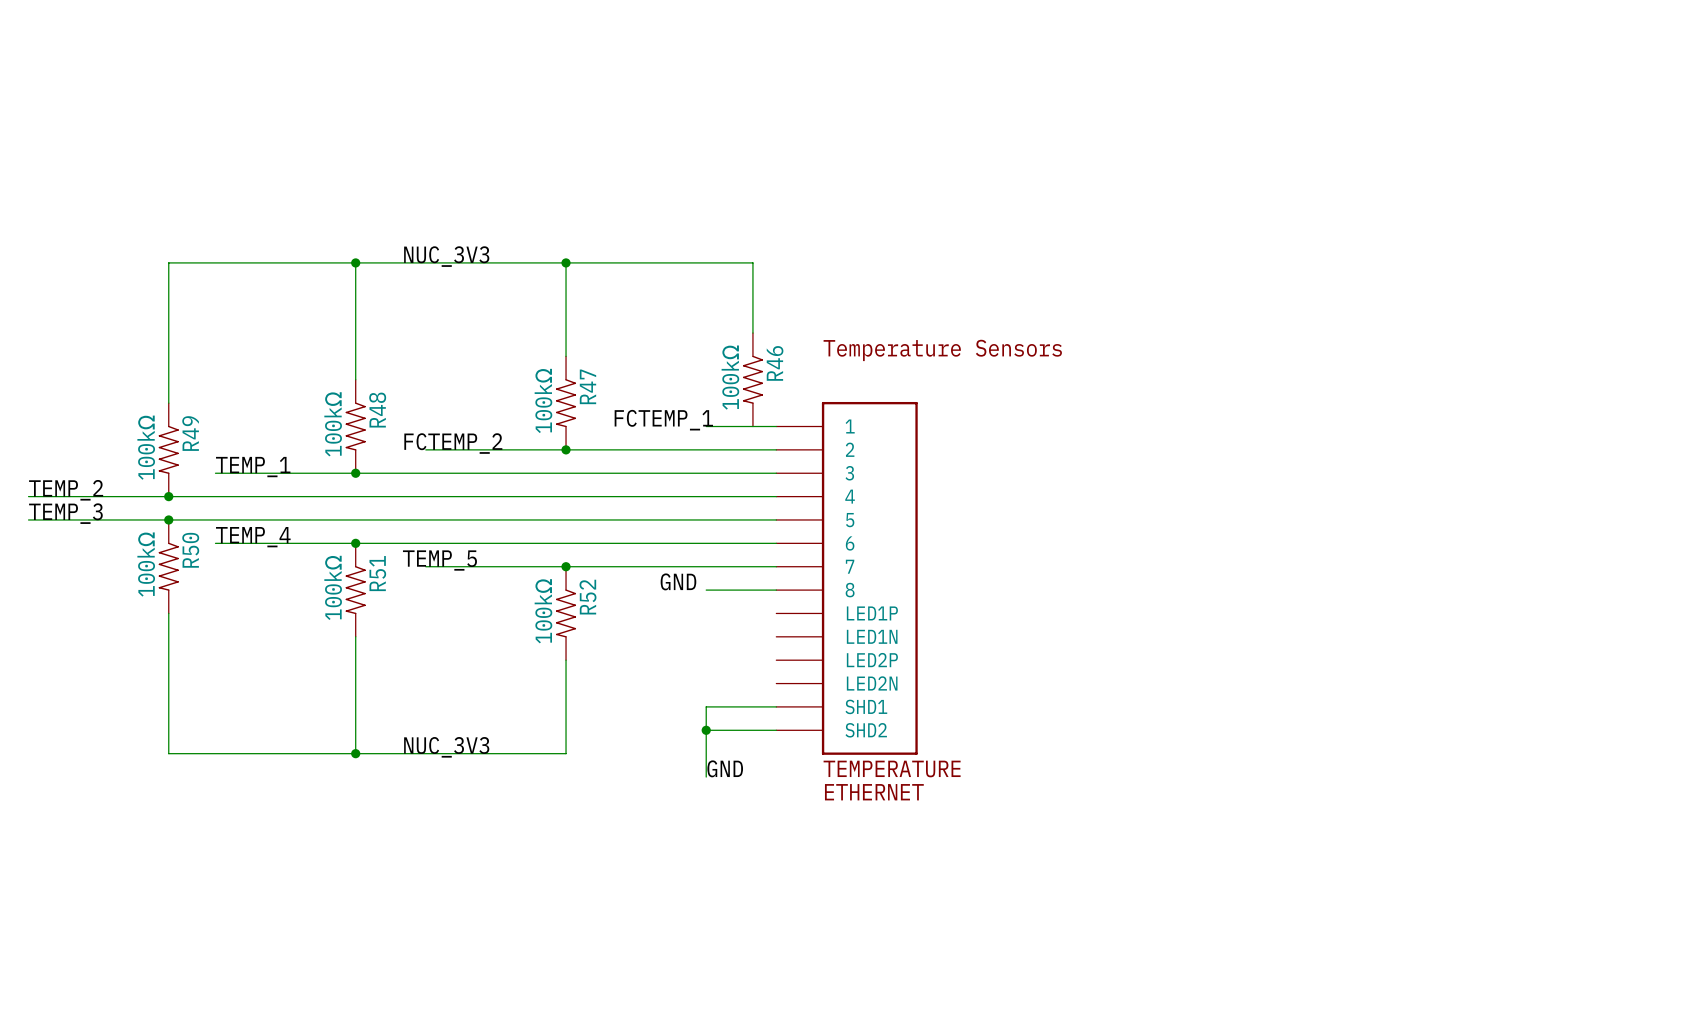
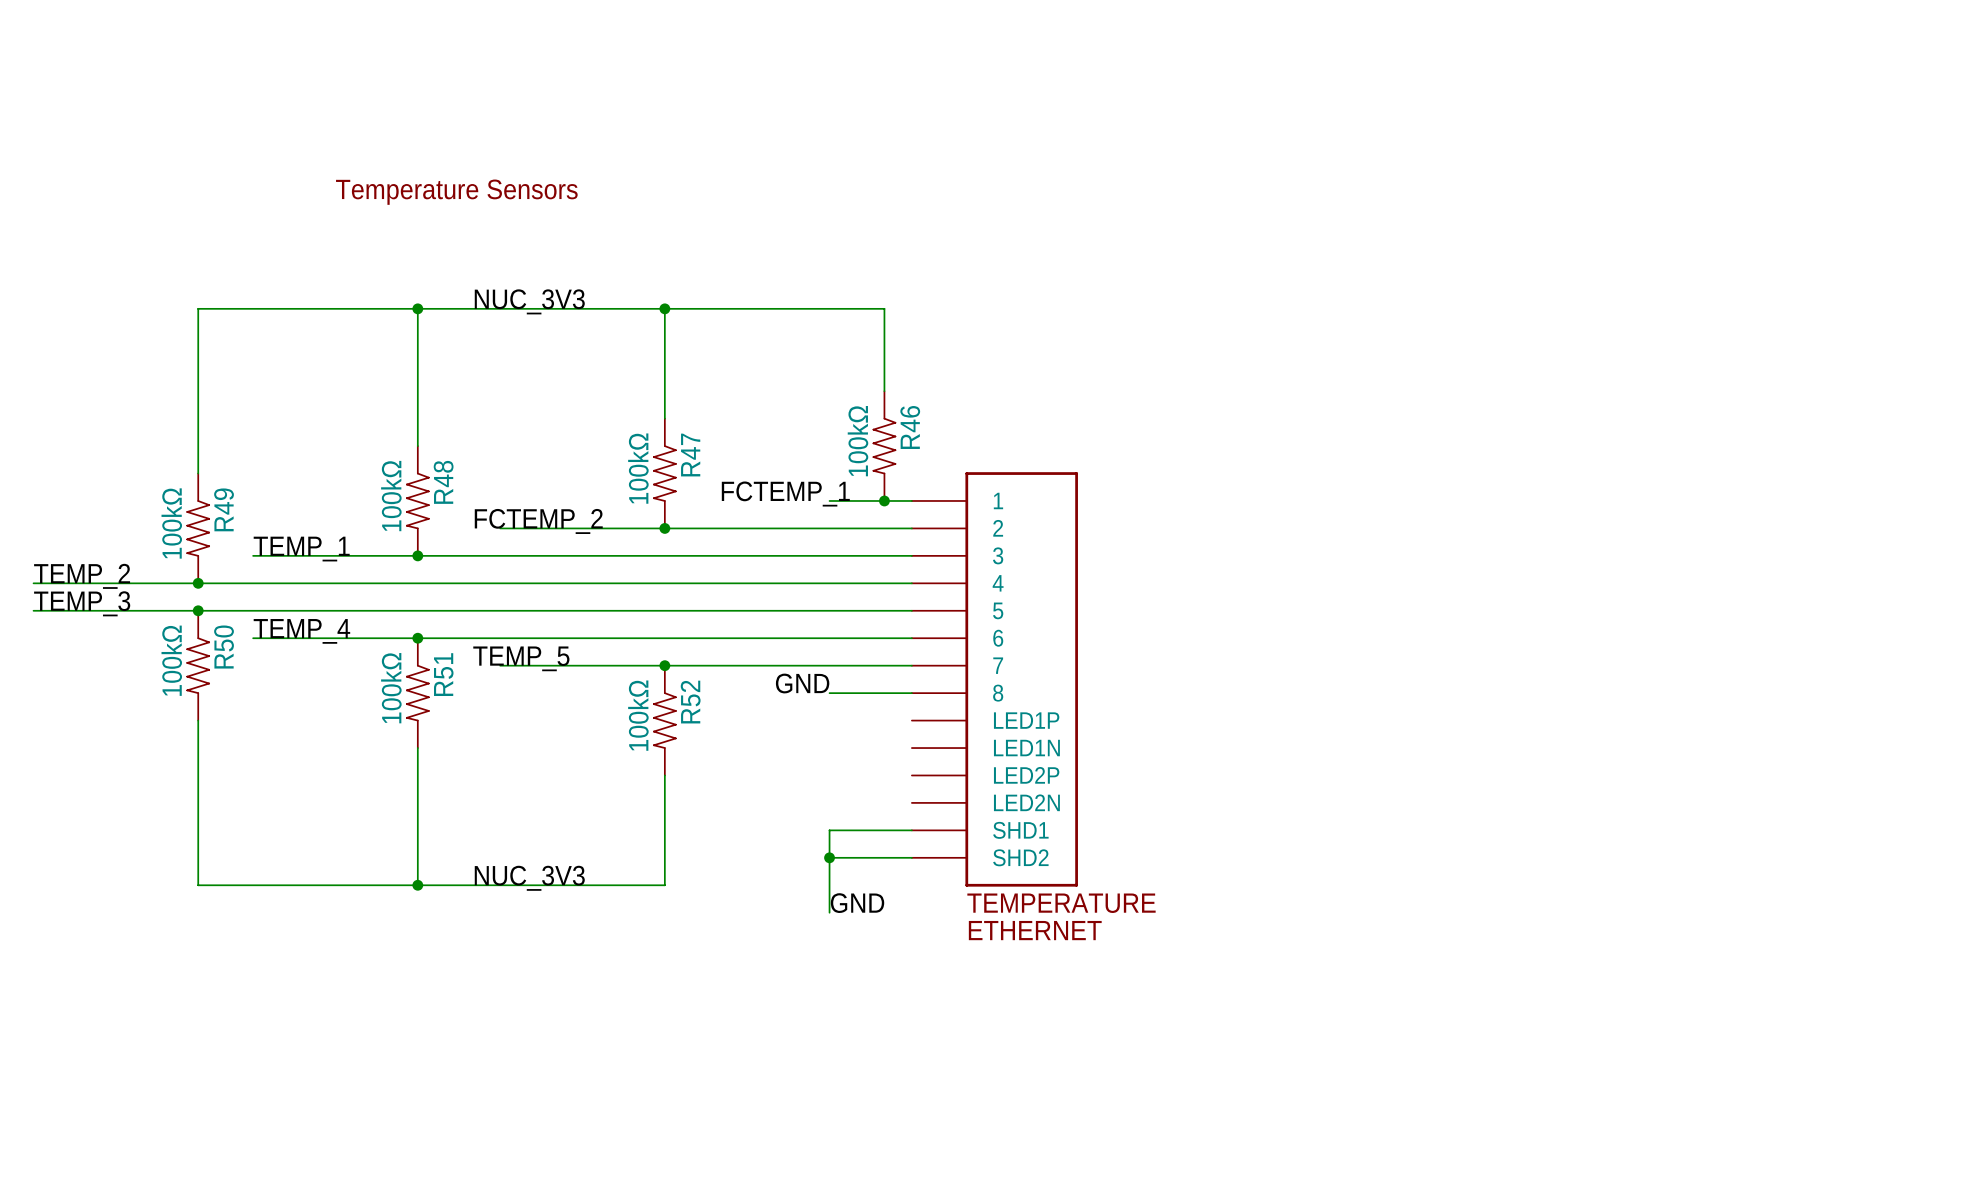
text: none -> Temperature Sensors (456, 192)
text: Temperature Sensors (942, 350) -> none
junction: none -> (884, 500)

